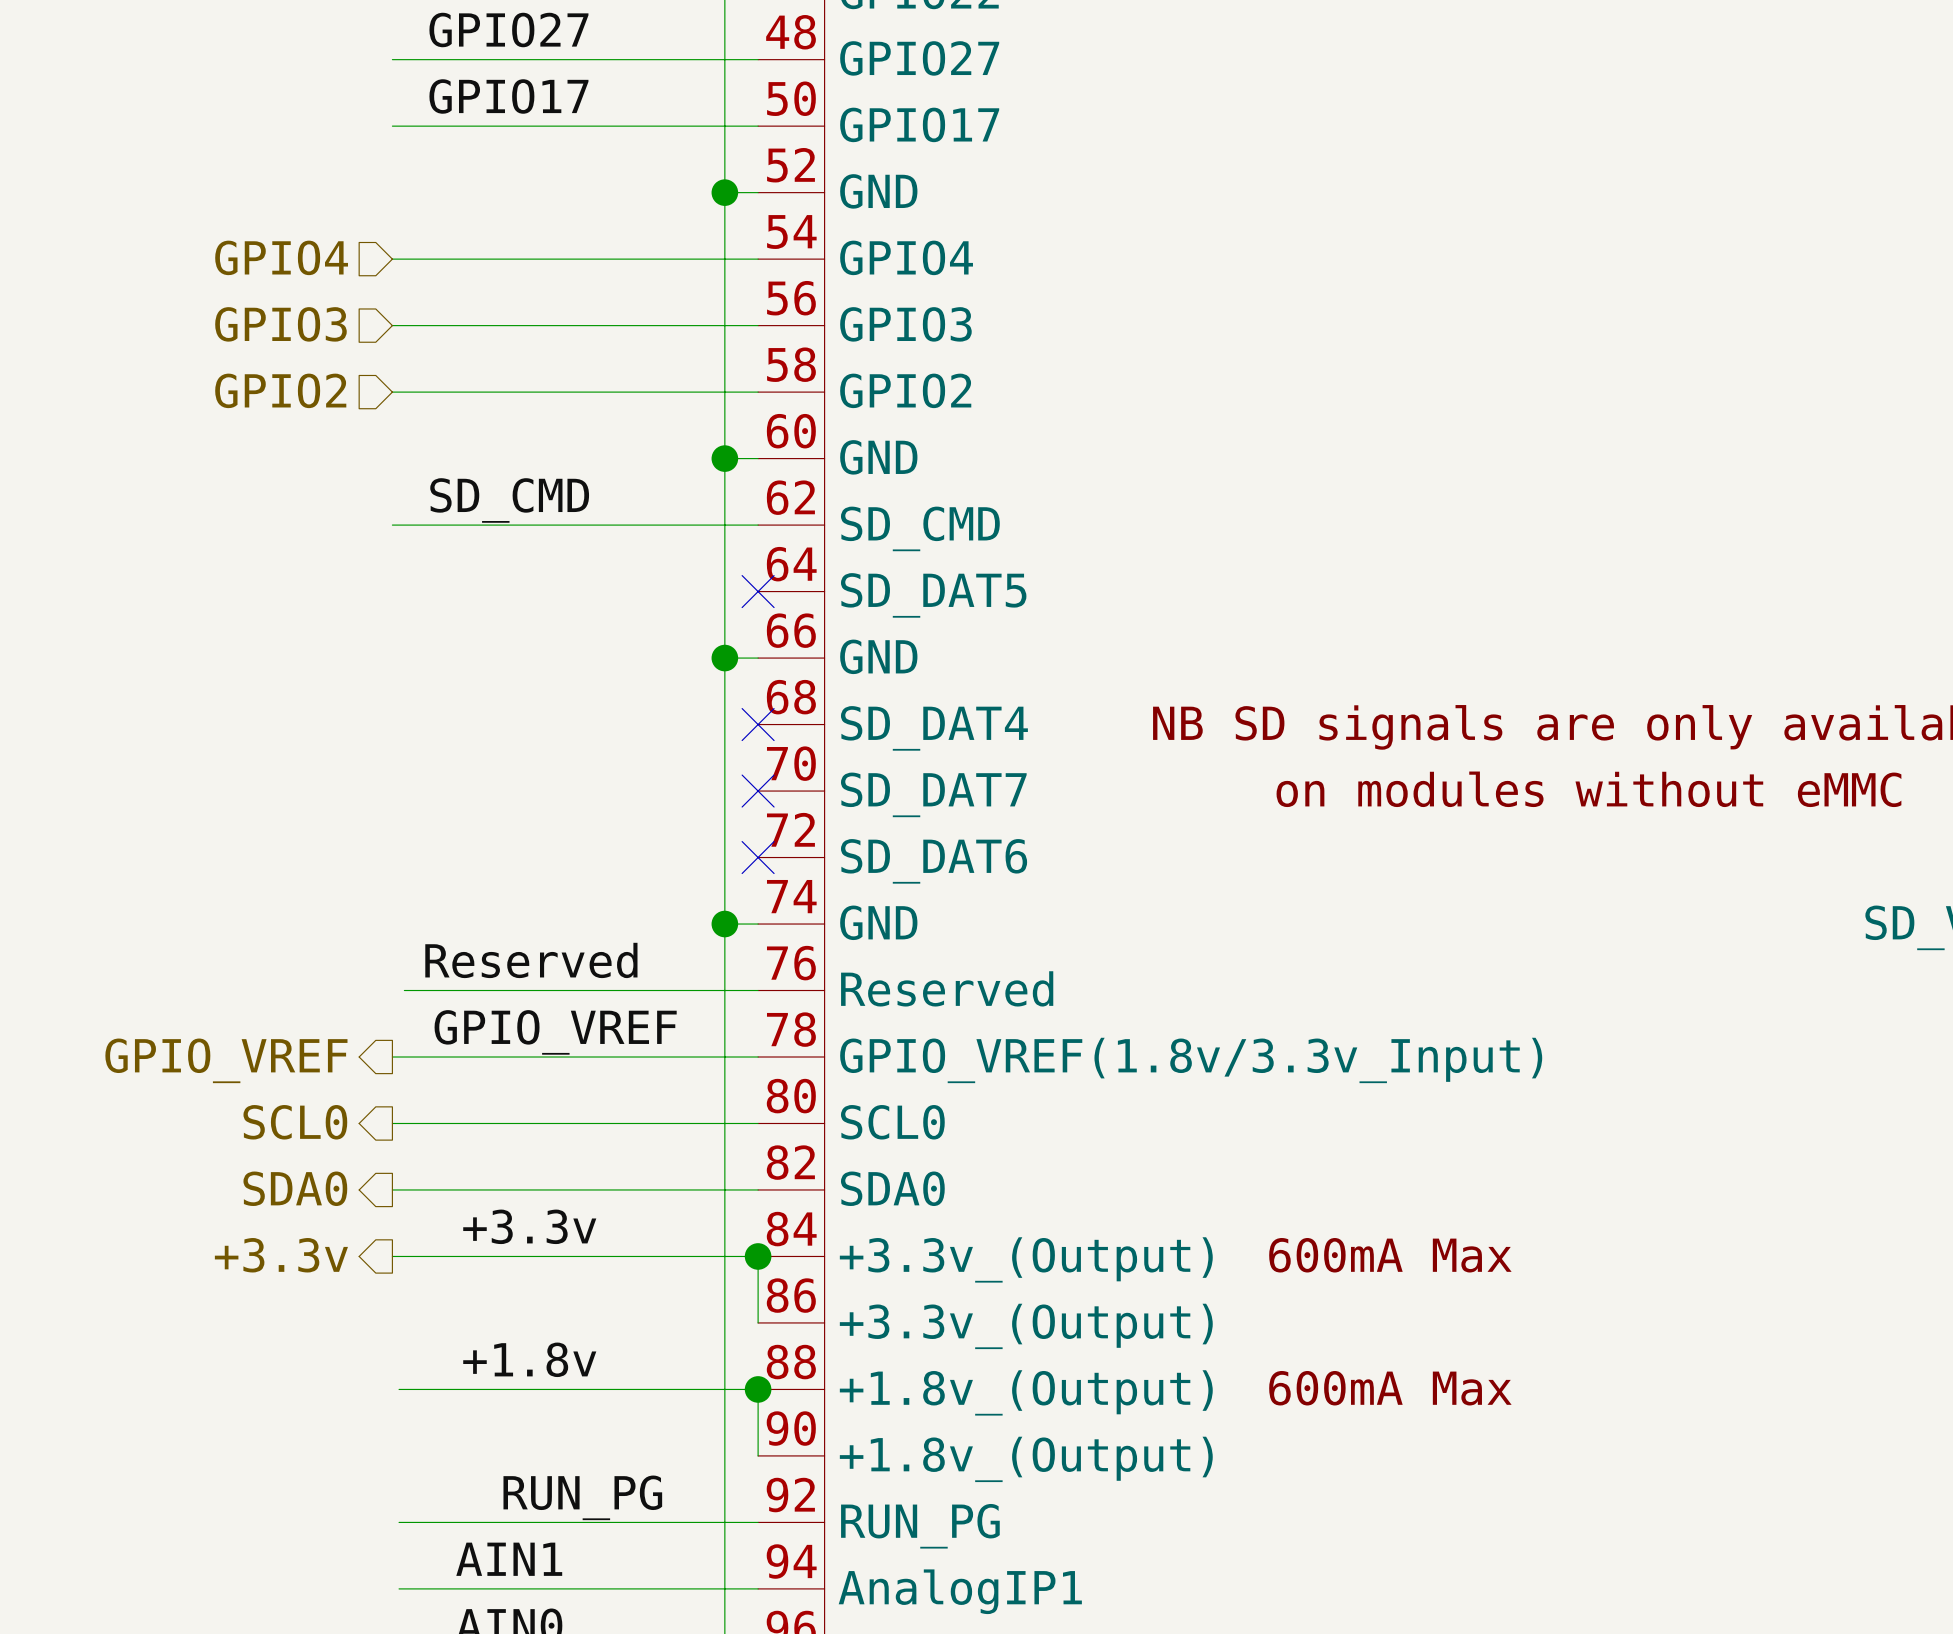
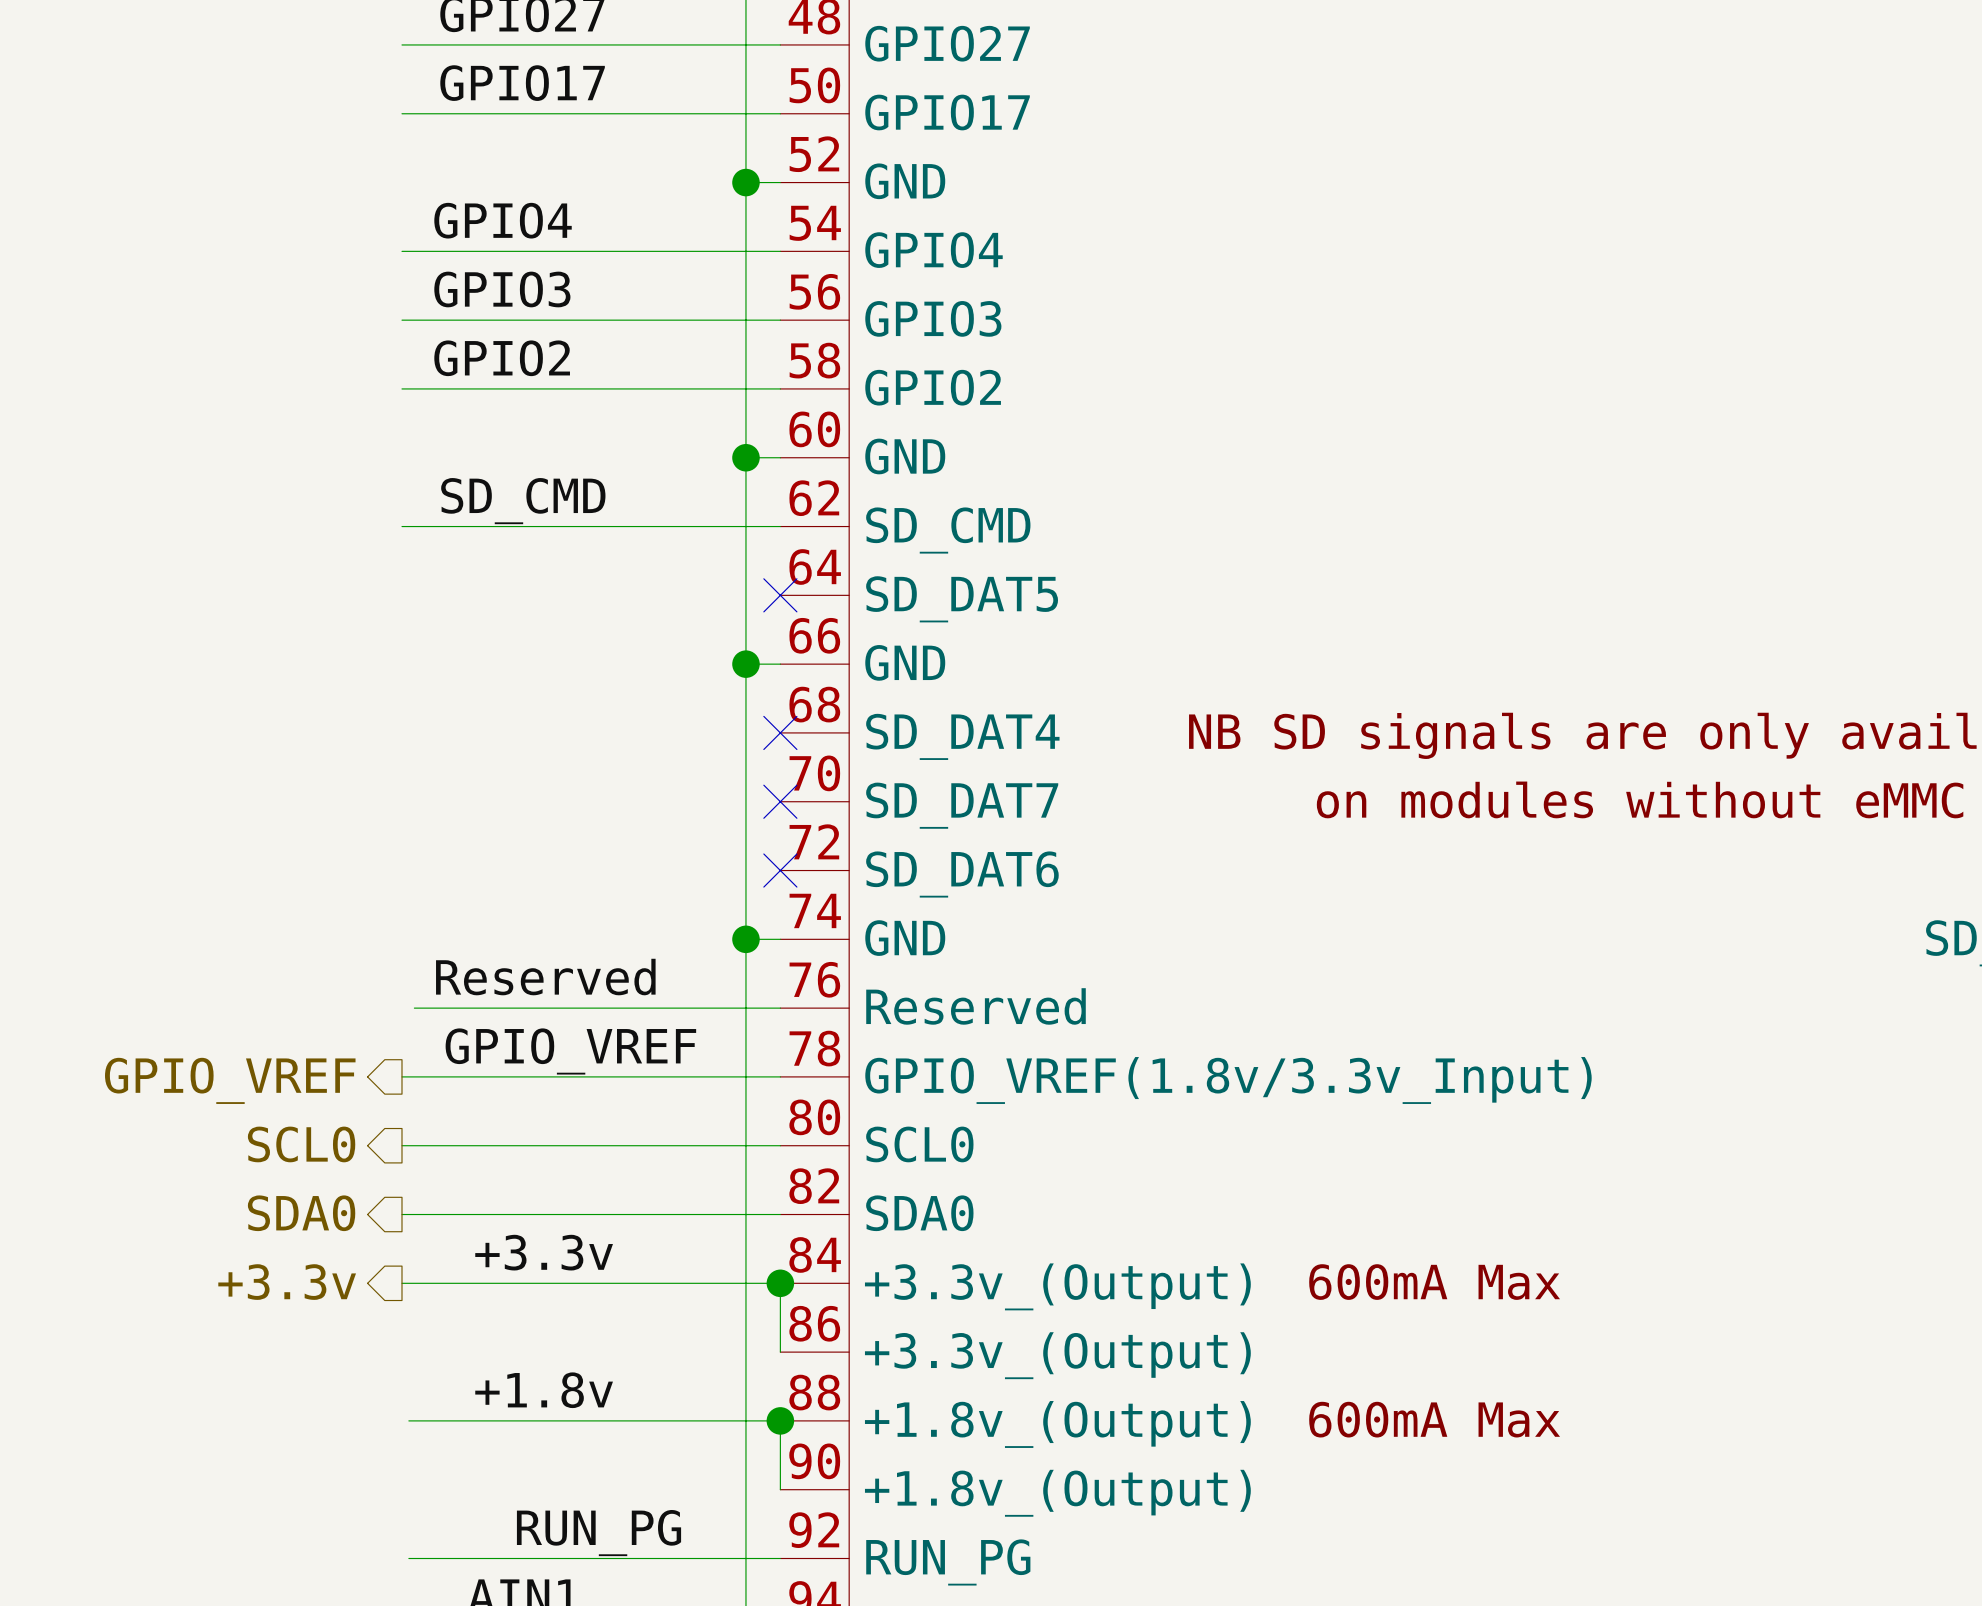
label: none -> GPIO4 (503, 220)
hierarchical label: GPIO4 (281, 257) -> none
label: none -> GPIO3 (502, 289)
hierarchical label: GPIO3 (280, 324) -> none
label: none -> GPIO2 (502, 358)
hierarchical label: GPIO2 (280, 390) -> none

